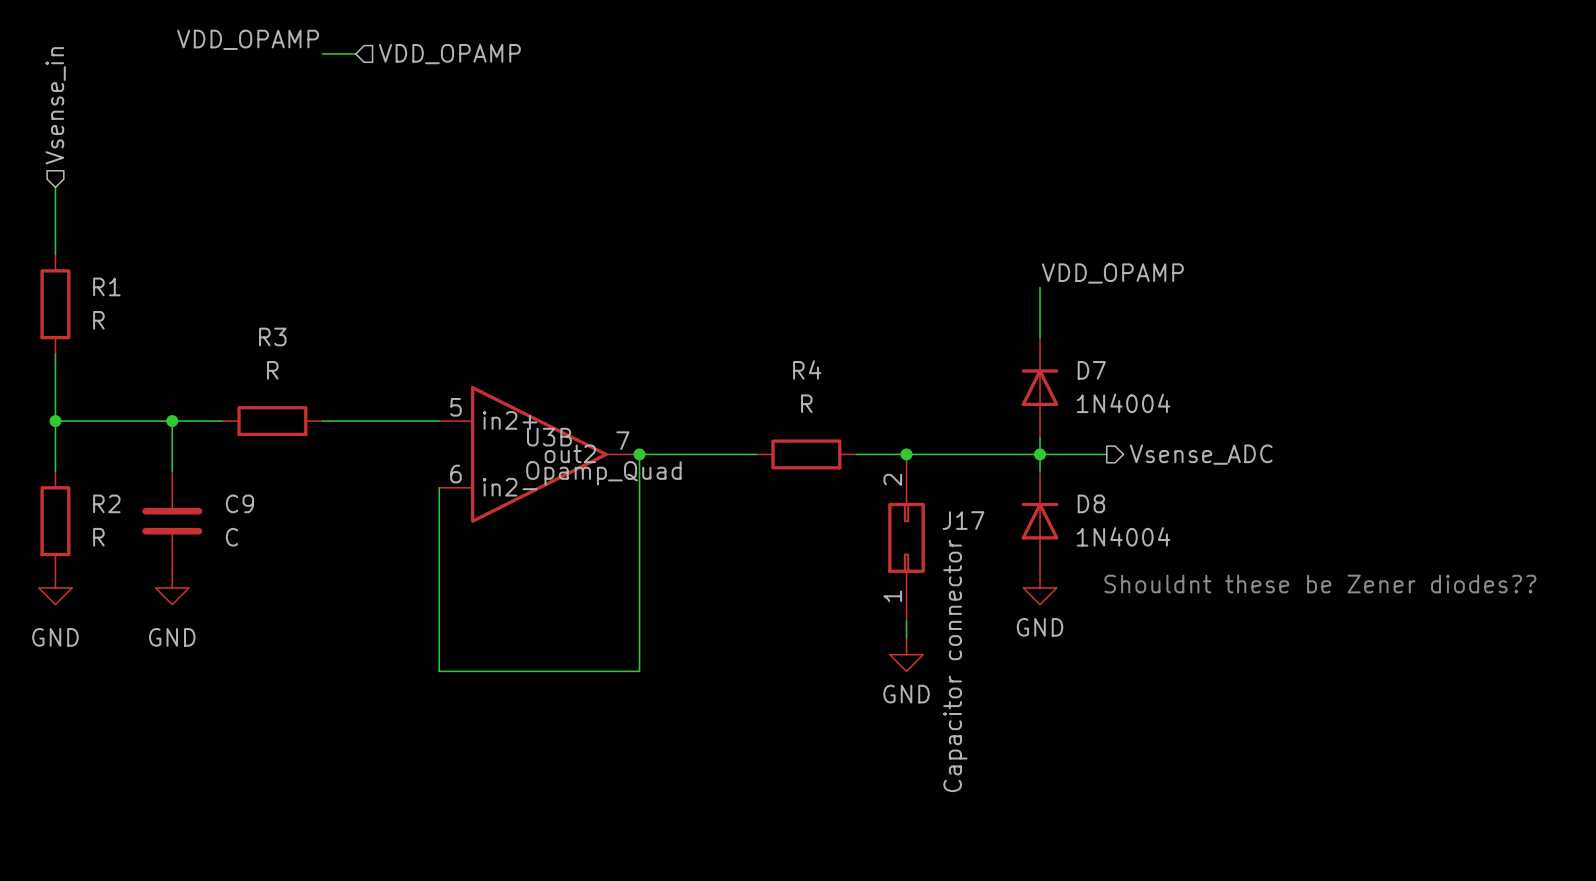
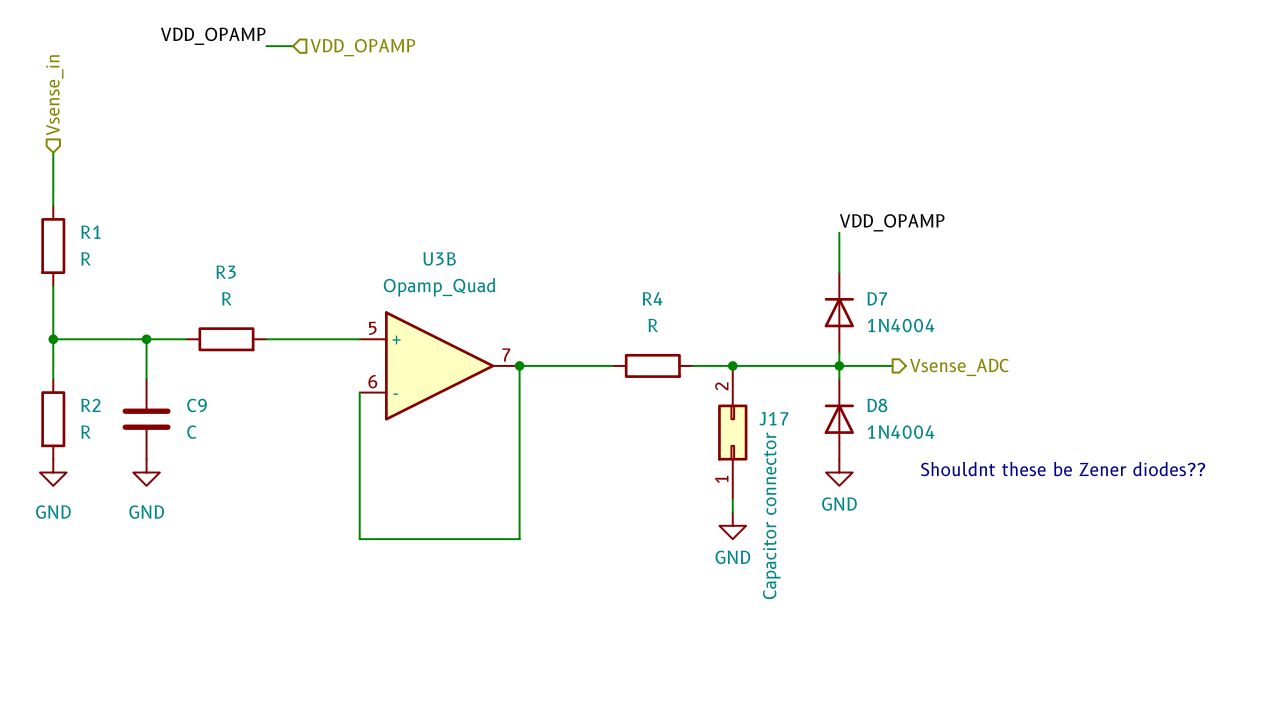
U3B pin name: in2+ (510, 420) -> + (396, 340)
U3B name position: U3B (549, 437) -> U3B (439, 258)
U3B pin name: out2 (570, 453) -> none
U3B value position: Opamp_Quad (603, 473) -> Opamp_Quad (439, 287)
U3B pin name: in2- (510, 487) -> - (395, 394)

